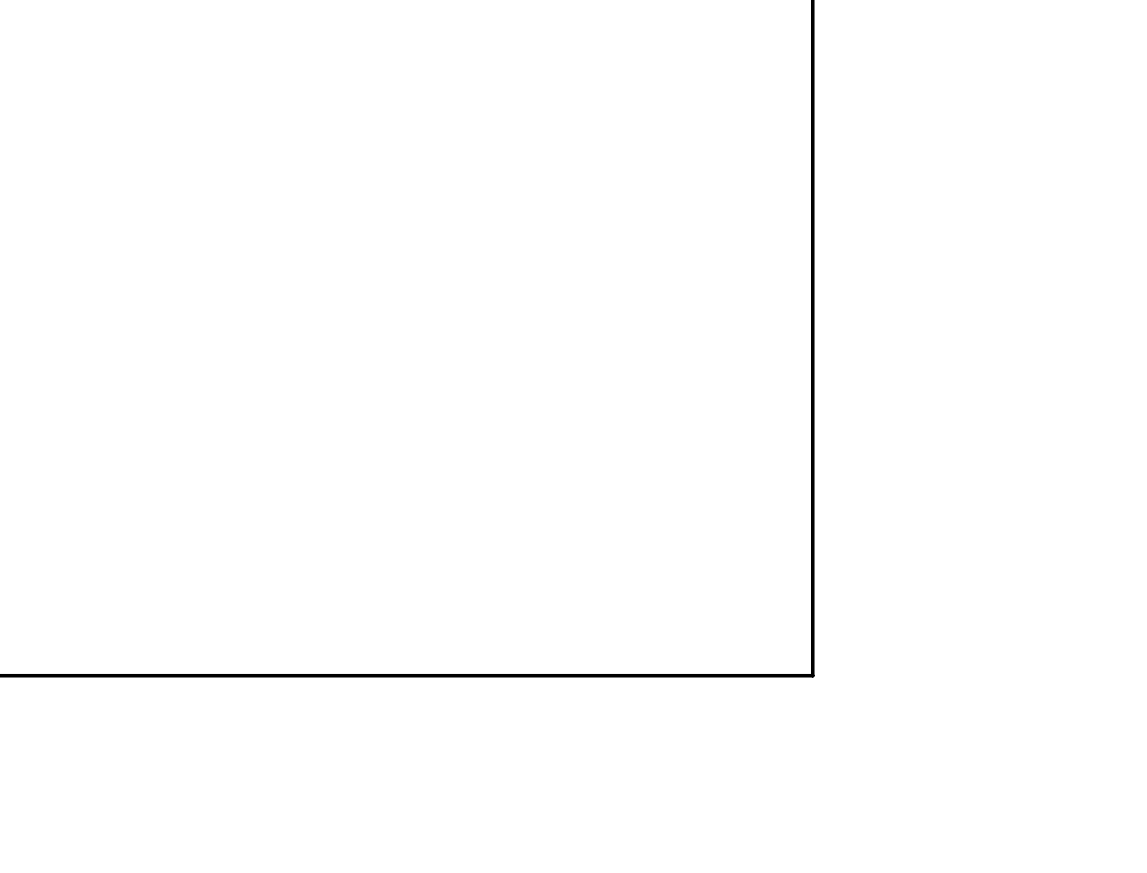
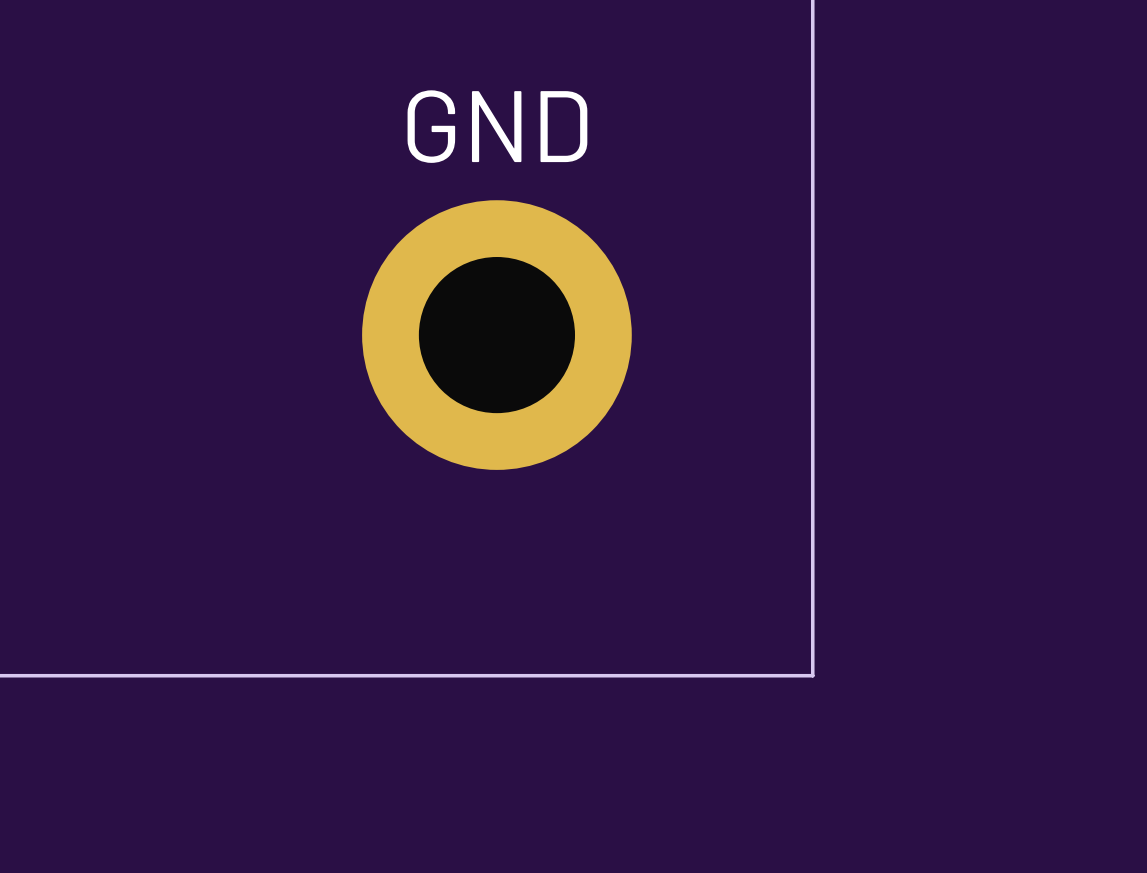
GND: none -> (496, 335)

